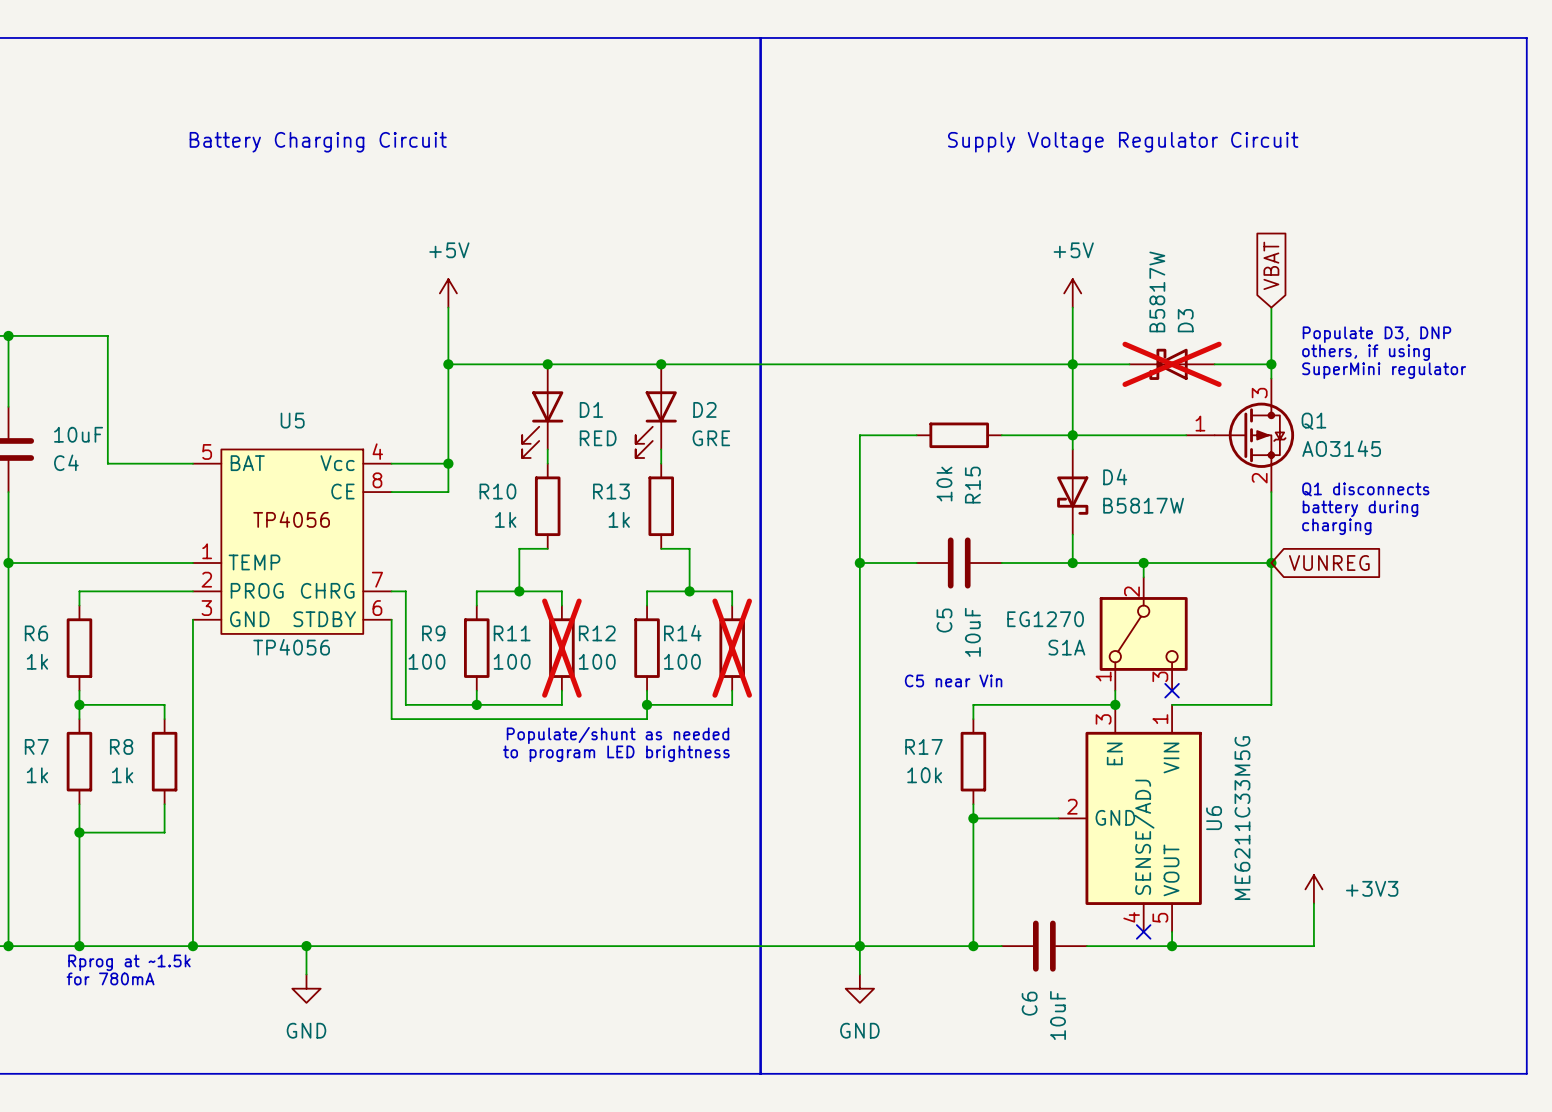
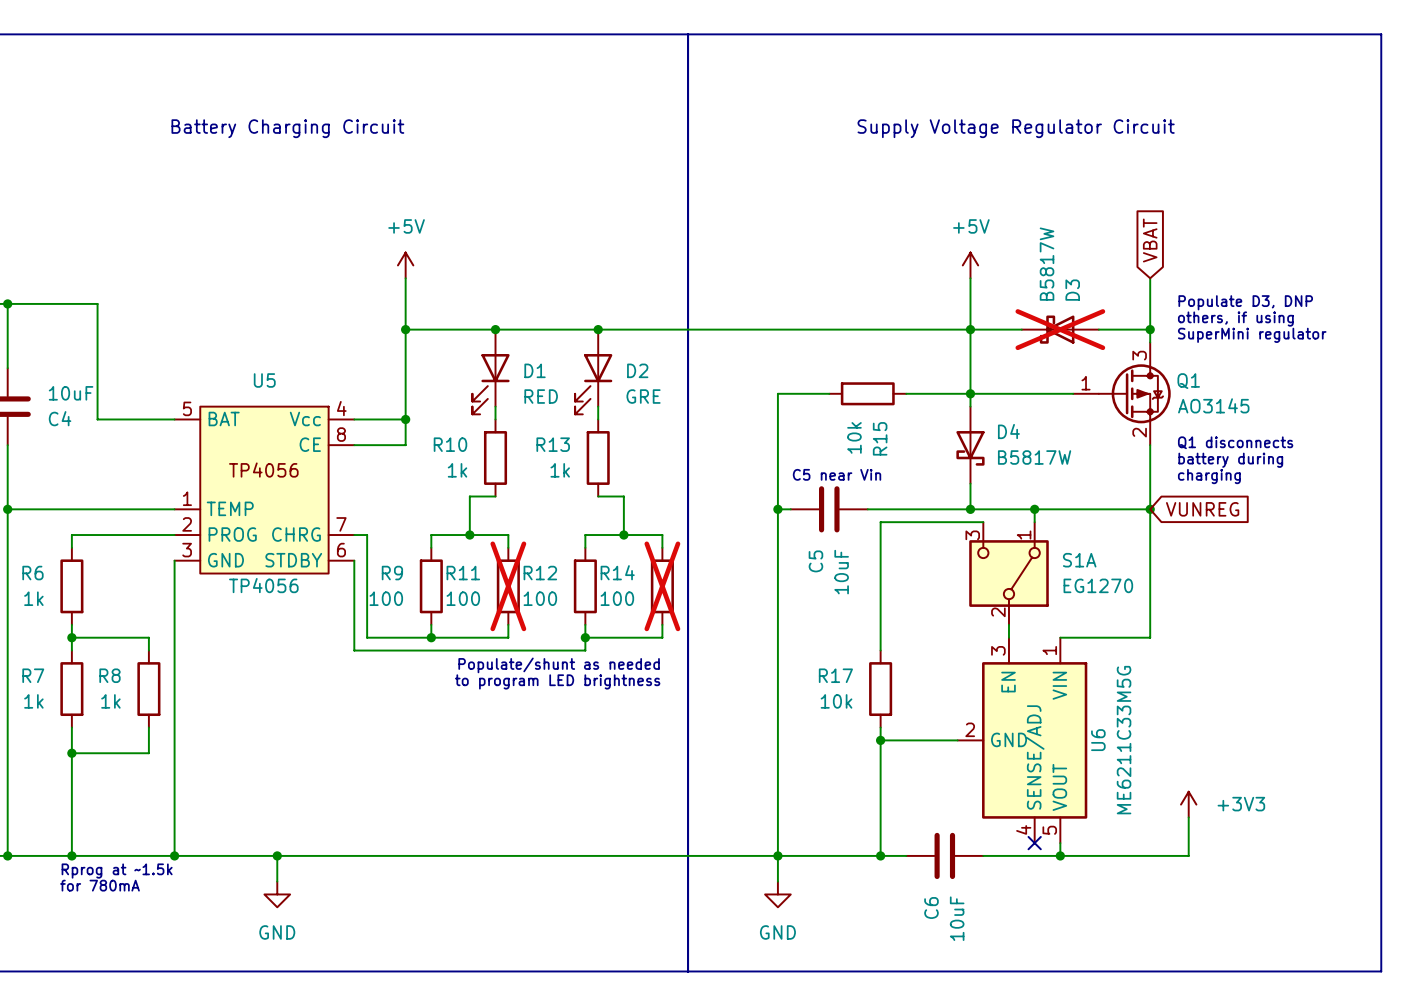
C5 position: (959, 563) -> (829, 509)
S1A rotation: 0° (1143, 633) -> 180° (1008, 573)
text position: C5 near Vin (953, 680) -> C5 near Vin (837, 474)
no-connect mark: (1172, 690) -> none
wire: (973, 704) (1115, 704) -> (880, 637) (880, 522) (983, 522)
junction: (1115, 704) -> none

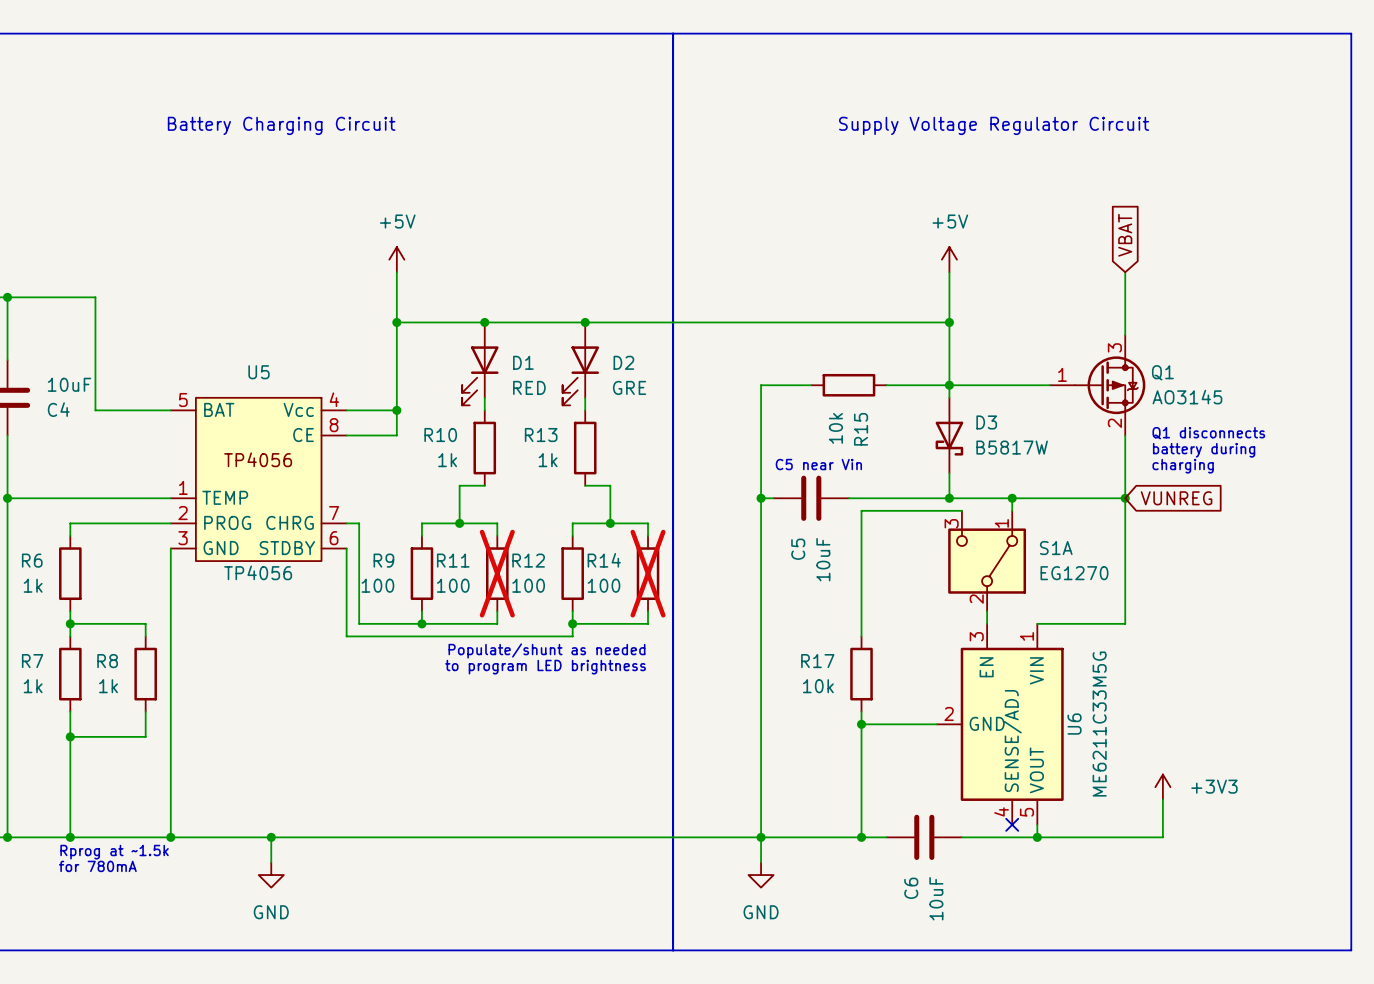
text: Populate D3, DNP (1245, 302) -> none
text: others, if using (1235, 319) -> none
wire: (970, 329) (1021, 329) -> none
D3: B5817W (1060, 329) -> none
wire: (1098, 329) (1150, 329) -> none
junction: (1150, 329) -> none
text: SuperMini regulator (1252, 335) -> none
D4 name: D4 (1008, 431) -> D3 (986, 422)

